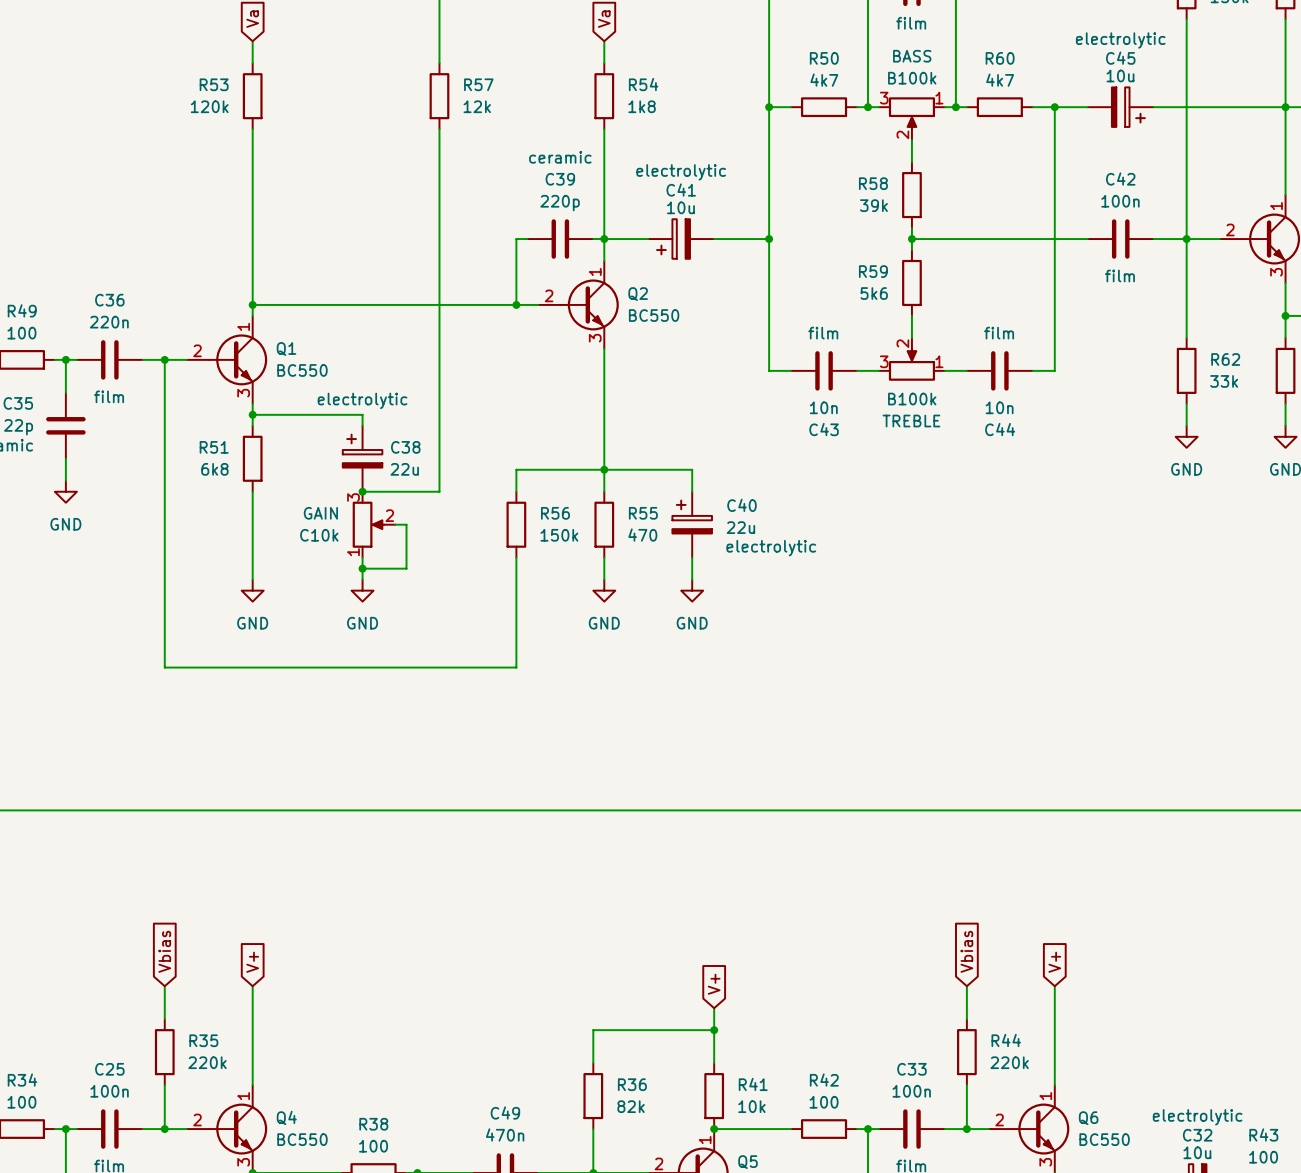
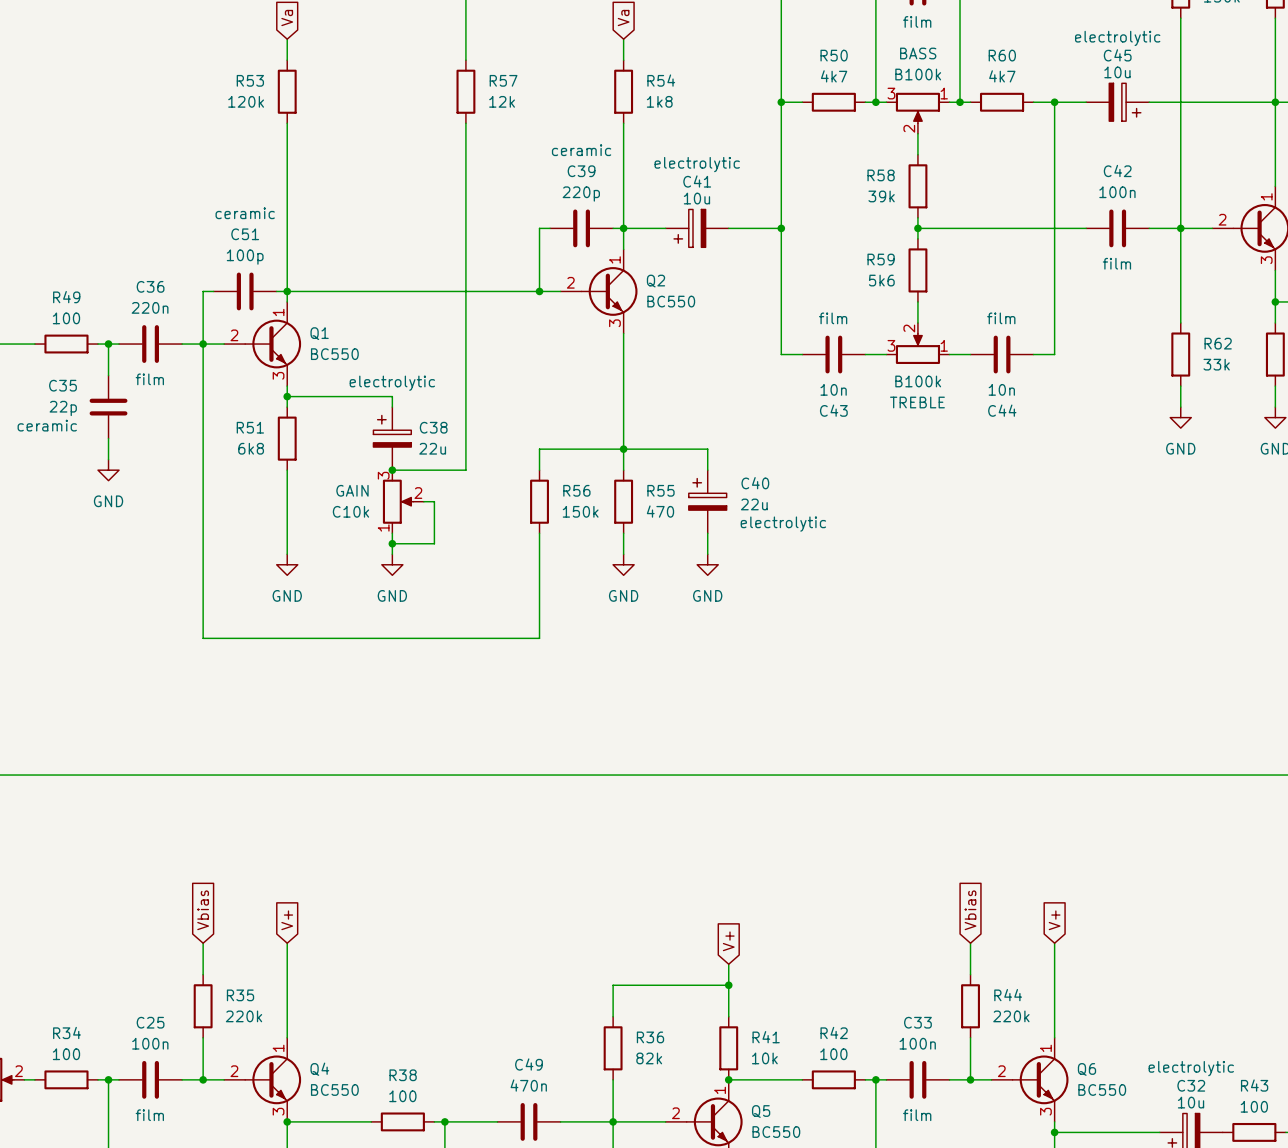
wire: none -> (213, 291) (203, 291) (203, 344)
C51: none -> 100p (245, 291)
wire: none -> (276, 291) (287, 291)

